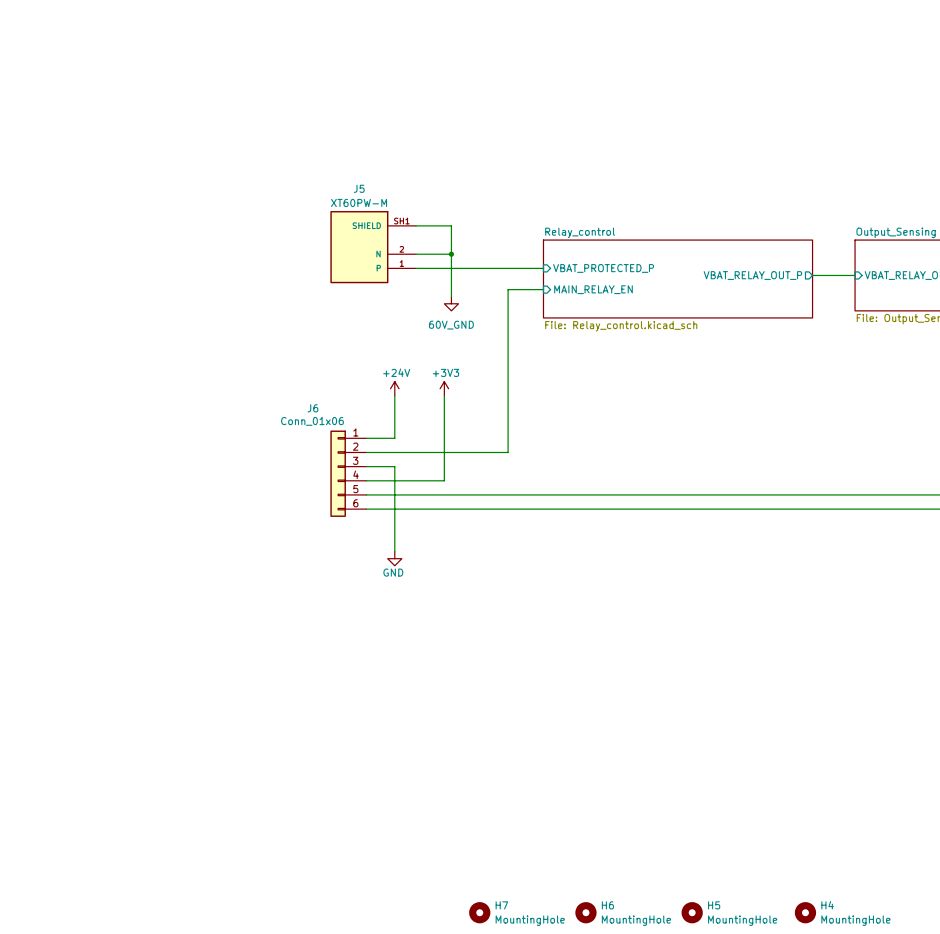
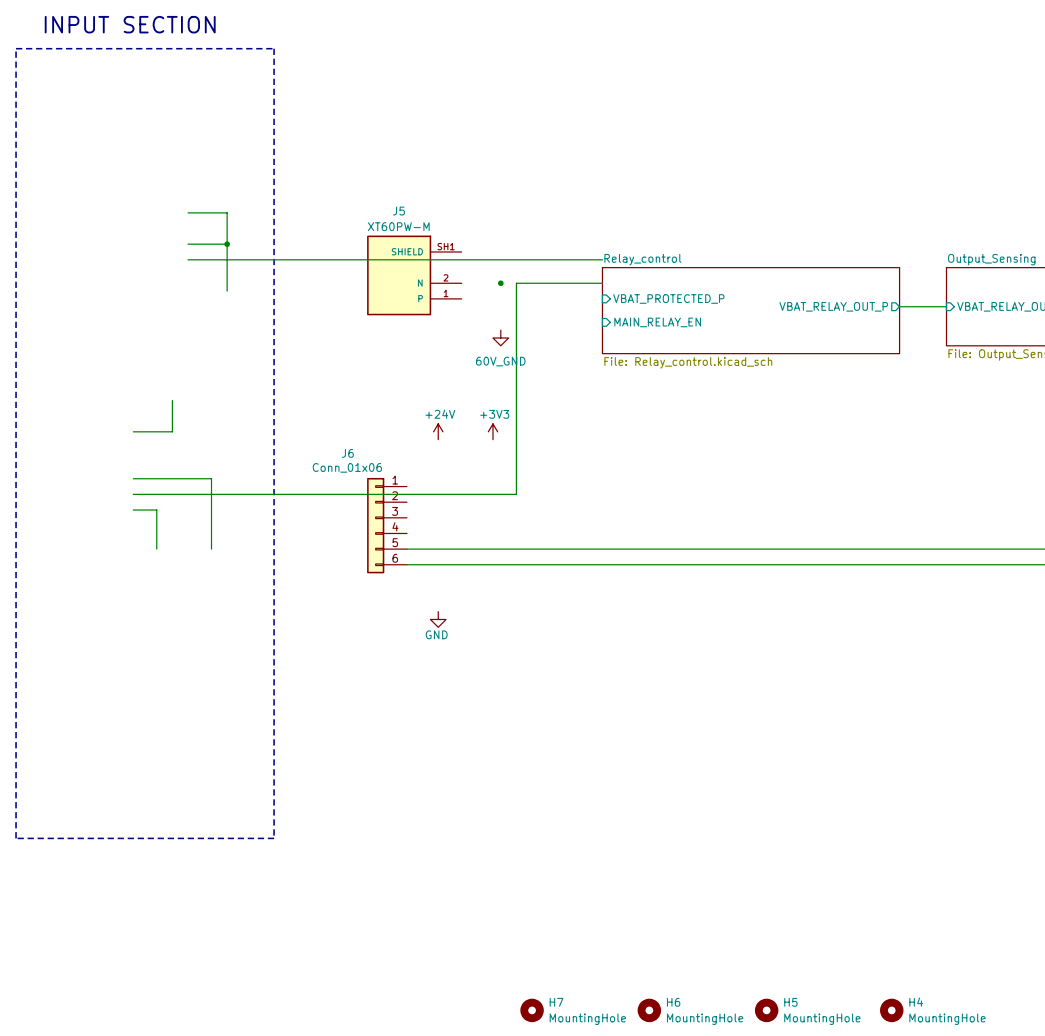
text: none -> INPUT SECTION (130, 24)
line: none -> (16, 48) (274, 48) (274, 838) (16, 838) (16, 48)
wire: none -> (188, 212) (227, 212) (227, 291)
wire: none -> (188, 244) (227, 244)
junction: none -> (227, 244)
wire: (416, 225) (451, 225) (451, 296) -> none
wire: none -> (188, 259) (602, 259)
wire: (416, 254) (451, 254) -> none
wire: none -> (602, 283) (516, 283) (516, 494) (133, 494)
wire: (416, 268) (543, 268) -> none
wire: (543, 289) (508, 289) (508, 452) (366, 452) -> none
wire: none -> (172, 400) (172, 431) (133, 431)
wire: (394, 395) (394, 438) (366, 438) -> none
wire: (444, 395) (444, 480) (366, 480) -> none
wire: none -> (133, 478) (211, 478) (211, 549)
wire: none -> (133, 510) (156, 510) (156, 549)
wire: (366, 466) (394, 466) (394, 551) -> none

